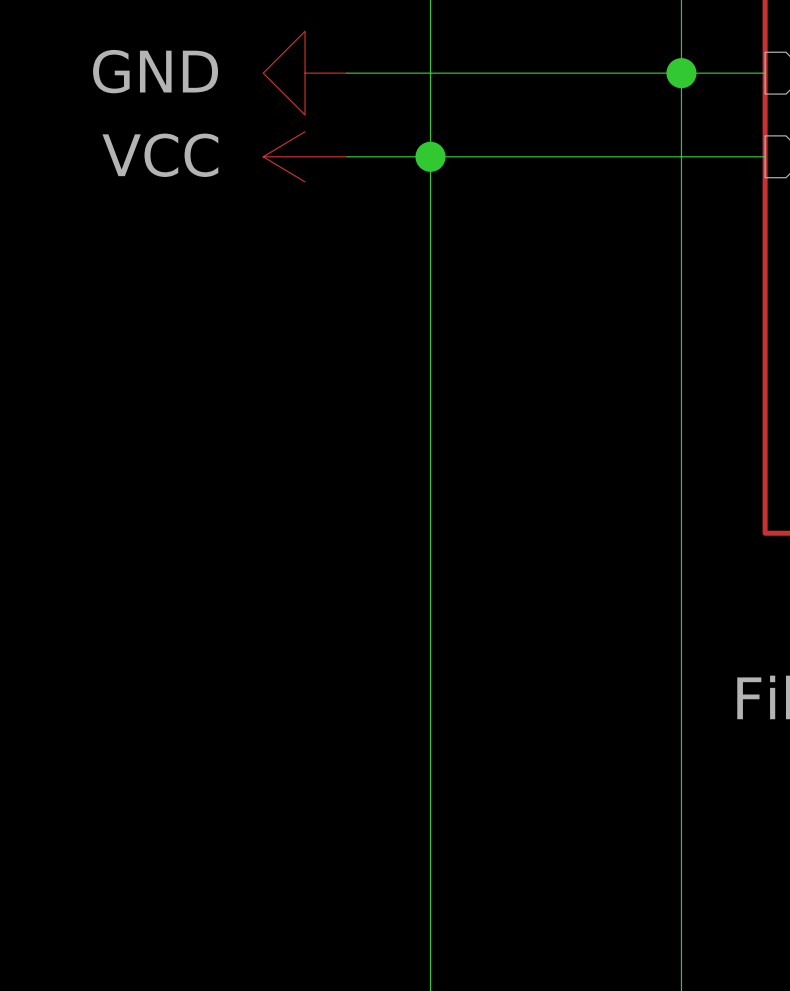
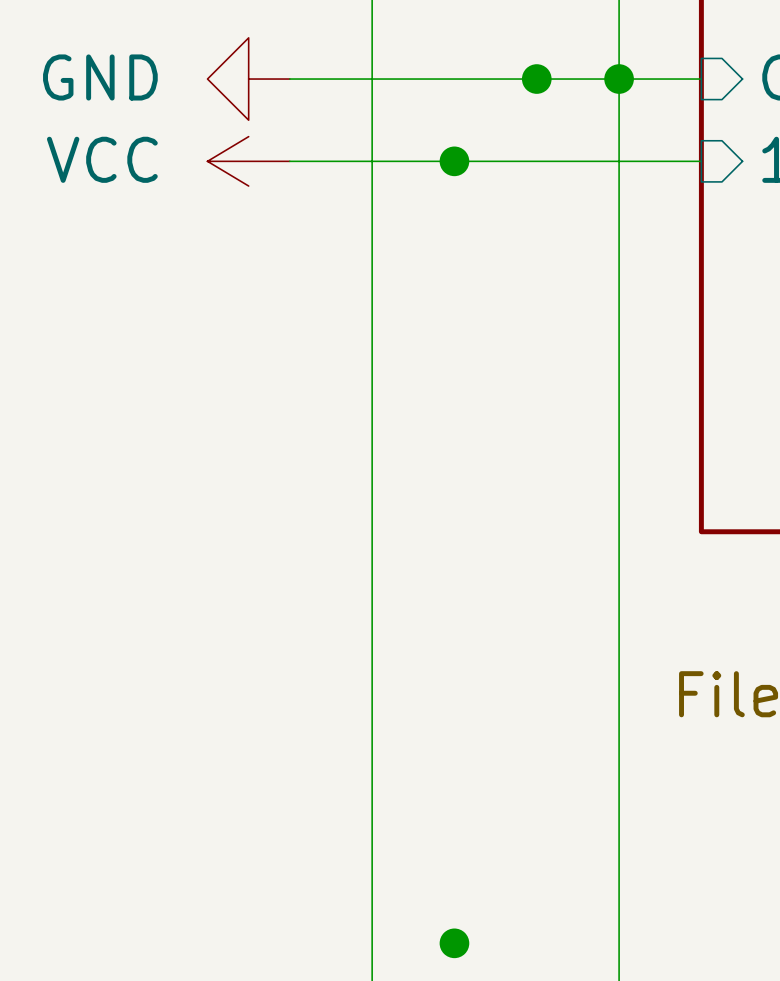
junction: none -> (536, 79)
junction position: (430, 156) -> (454, 161)
junction: none -> (454, 943)

